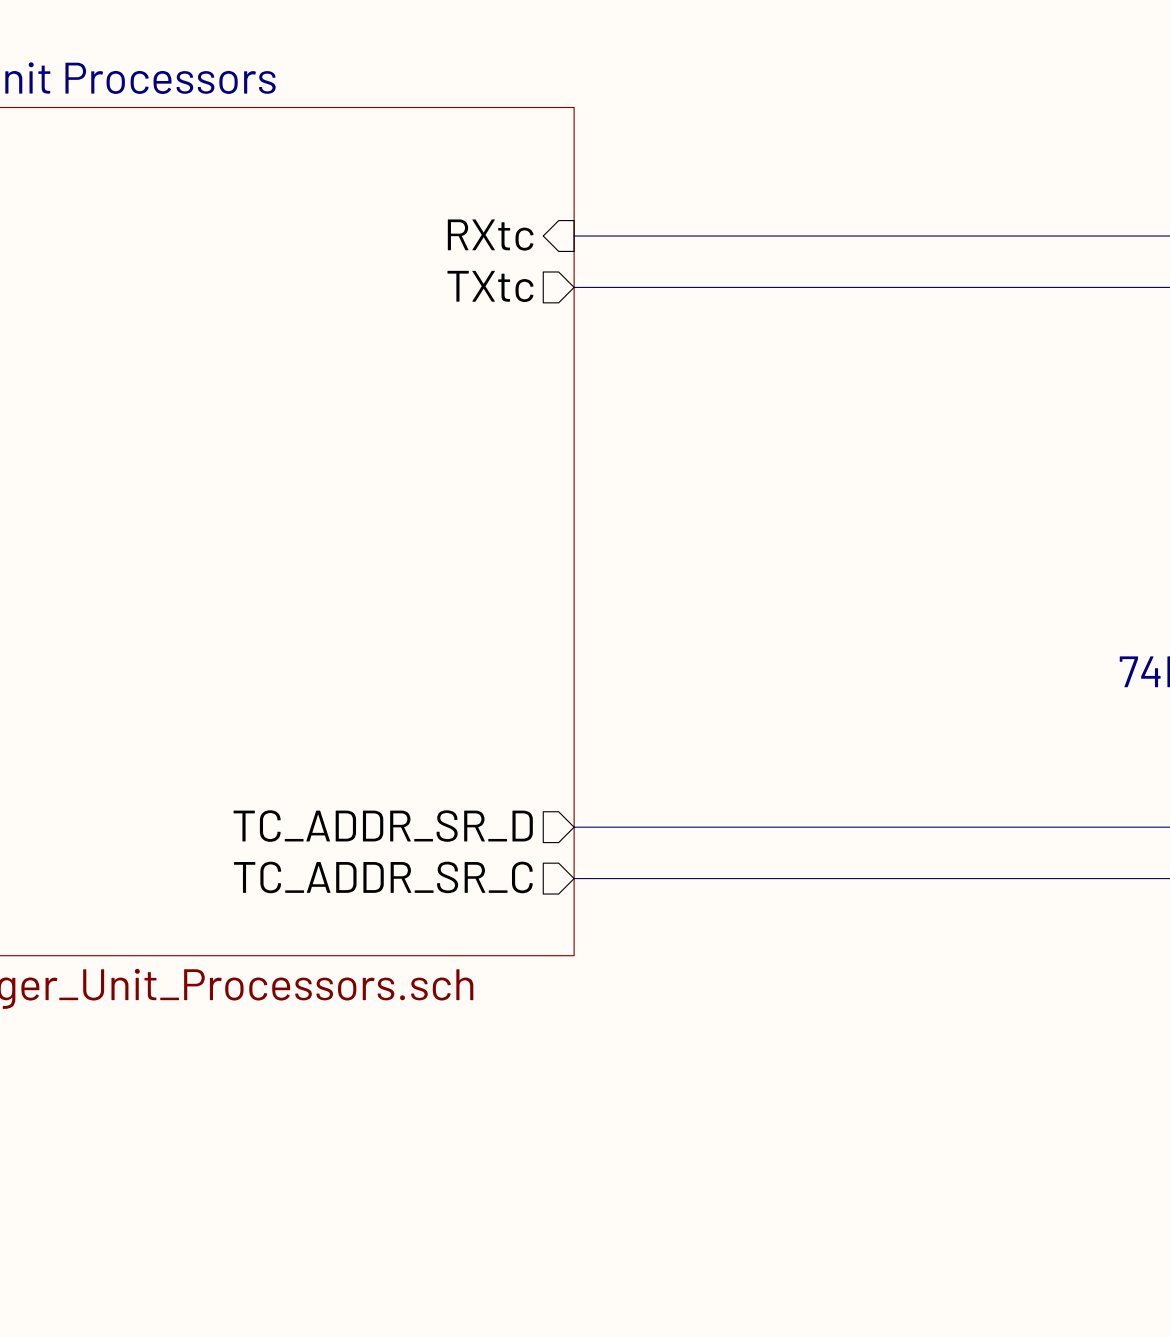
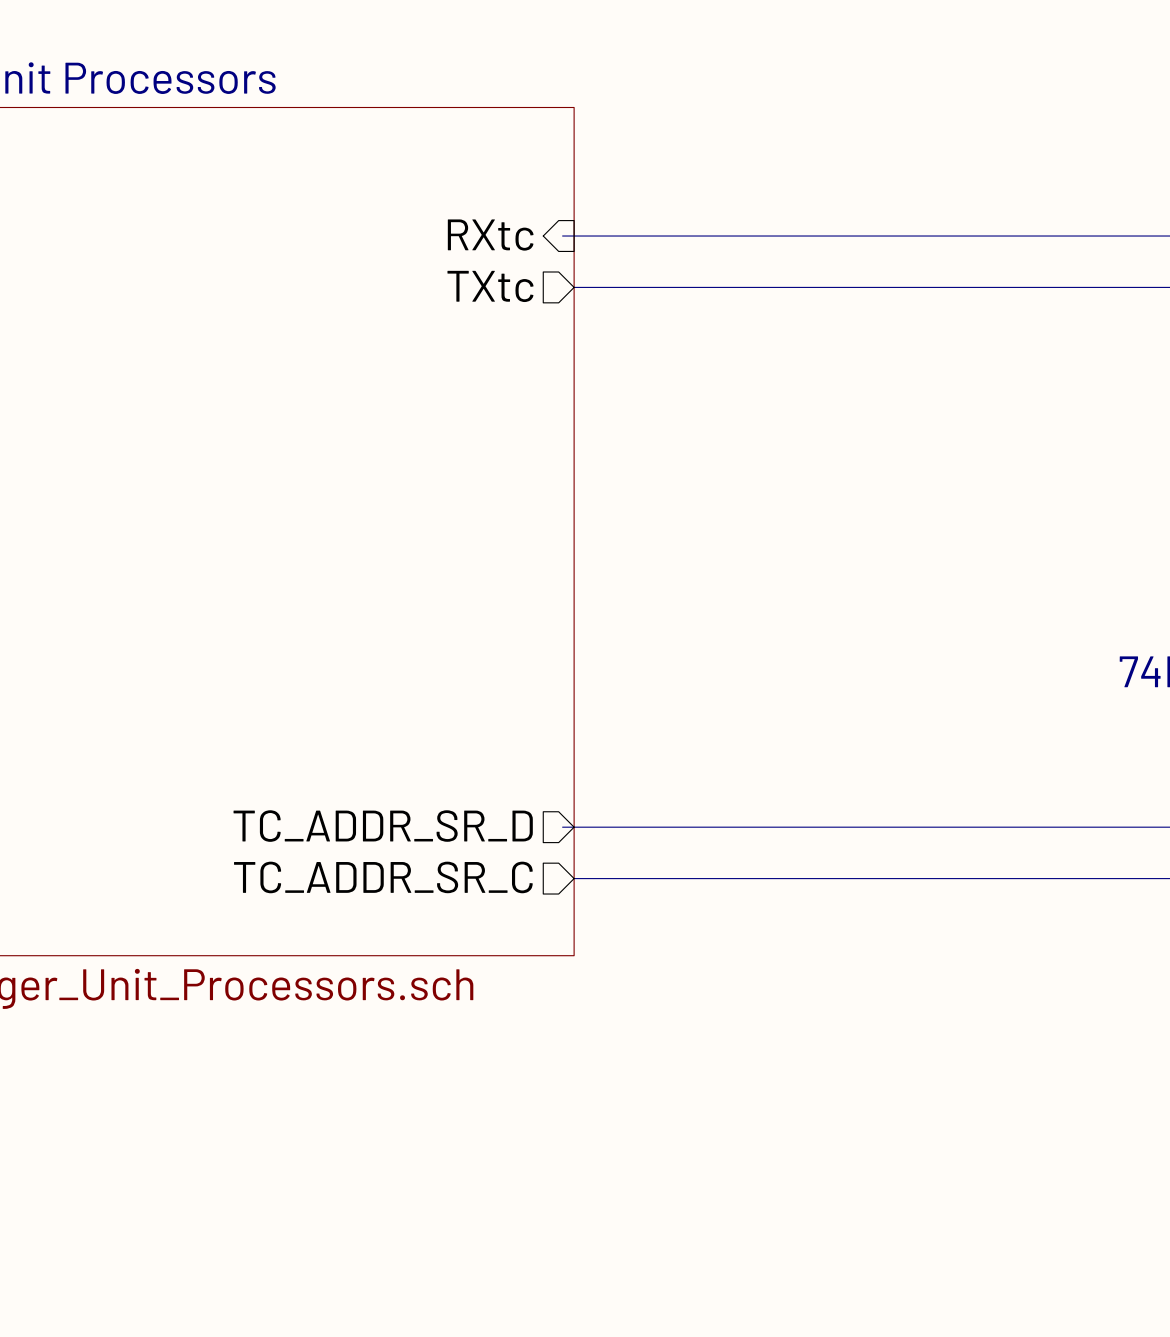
wire: none -> (562, 236) (574, 236)
wire: none -> (562, 827) (574, 827)

